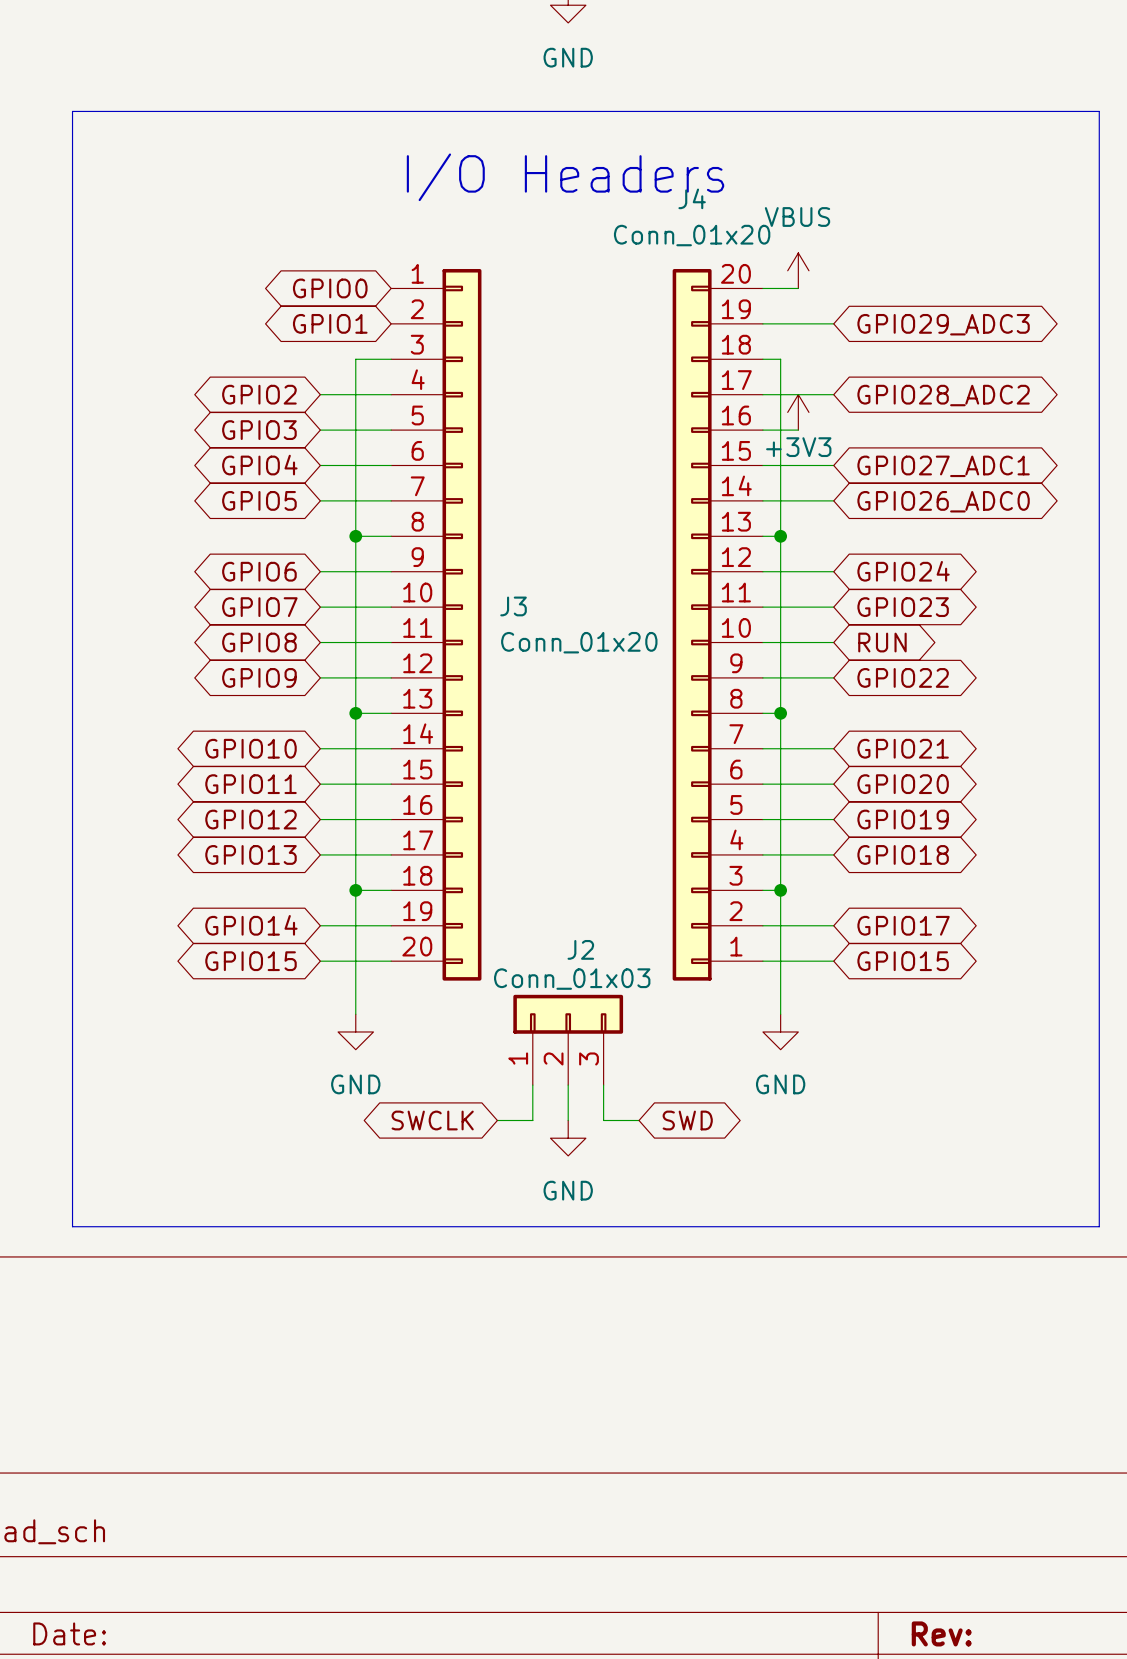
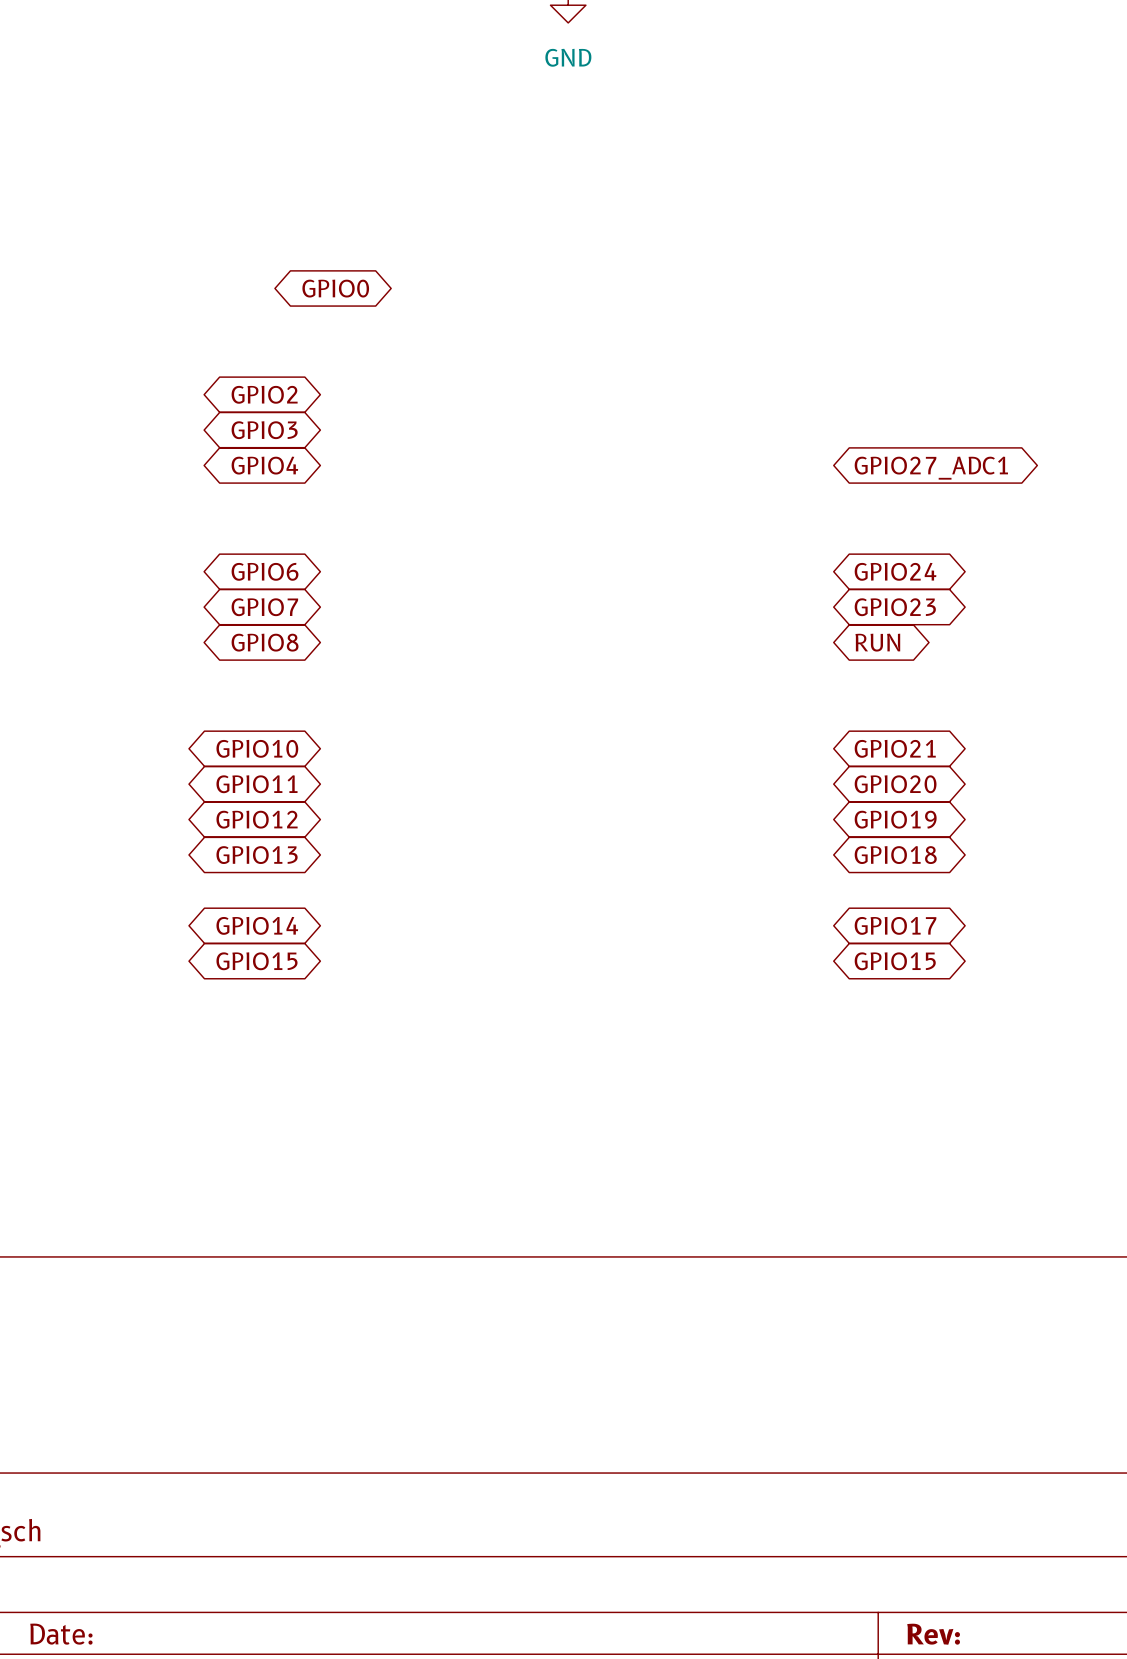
bus: (72, 111) (1099, 111) (1099, 1226) (72, 1226) (72, 111) -> none
text: I/O Headers (565, 177) -> none
power symbol: VBUS (798, 270) -> none
wire: (762, 288) (798, 288) -> none
global label: GPIO1 (330, 323) -> none
wire: (762, 323) (833, 323) -> none
global label: GPIO29_ADC3 (943, 324) -> none
wire: (391, 359) (355, 359) (355, 1014) -> none
wire: (762, 359) (780, 359) (780, 1014) -> none
wire: (320, 394) (391, 394) -> none
wire: (762, 394) (833, 394) -> none
global label: GPIO28_ADC2 (943, 395) -> none
power symbol: +3V3 (798, 412) -> none
wire: (320, 430) (391, 430) -> none
wire: (762, 430) (798, 430) -> none
wire: (320, 465) (391, 465) -> none
wire: (762, 465) (833, 465) -> none
global label: GPIO5 (259, 500) -> none
wire: (320, 500) (391, 500) -> none
wire: (762, 500) (833, 500) -> none
global label: GPIO26_ADC0 (943, 501) -> none
wire: (355, 536) (391, 536) -> none
junction: (355, 536) -> none
wire: (762, 536) (780, 536) -> none
junction: (780, 536) -> none
wire: (320, 571) (391, 571) -> none
wire: (762, 571) (833, 571) -> none
wire: (320, 607) (391, 607) -> none
wire: (762, 607) (833, 607) -> none
J3: Conn_01x20 (436, 624) -> none
J4: Conn_01x20 (717, 624) -> none
wire: (320, 642) (391, 642) -> none
wire: (762, 642) (833, 642) -> none
global label: GPIO9 (259, 677) -> none
wire: (320, 677) (391, 677) -> none
wire: (762, 677) (833, 677) -> none
global label: GPIO22 (903, 677) -> none
wire: (355, 713) (391, 713) -> none
junction: (355, 713) -> none
wire: (762, 713) (780, 713) -> none
junction: (780, 713) -> none
wire: (320, 748) (391, 748) -> none
wire: (762, 748) (833, 748) -> none
wire: (320, 784) (391, 784) -> none
wire: (762, 784) (833, 784) -> none
wire: (320, 819) (391, 819) -> none
wire: (762, 819) (833, 819) -> none
wire: (320, 854) (391, 854) -> none
wire: (762, 854) (833, 854) -> none
wire: (355, 890) (391, 890) -> none
junction: (355, 890) -> none
wire: (762, 890) (780, 890) -> none
junction: (780, 890) -> none
wire: (320, 925) (391, 925) -> none
wire: (762, 925) (833, 925) -> none
wire: (320, 961) (391, 961) -> none
wire: (762, 961) (833, 961) -> none
power symbol: GND (355, 1031) -> none
power symbol: GND (780, 1031) -> none
J2: Conn_01x03 (568, 1039) -> none
wire: (532, 1085) (532, 1120) (497, 1120) -> none
wire: (568, 1085) (568, 1120) -> none
wire: (603, 1085) (603, 1120) (639, 1120) -> none
global label: SWCLK (432, 1120) -> none
global label: SWD (687, 1120) -> none
power symbol: GND (568, 1138) -> none

